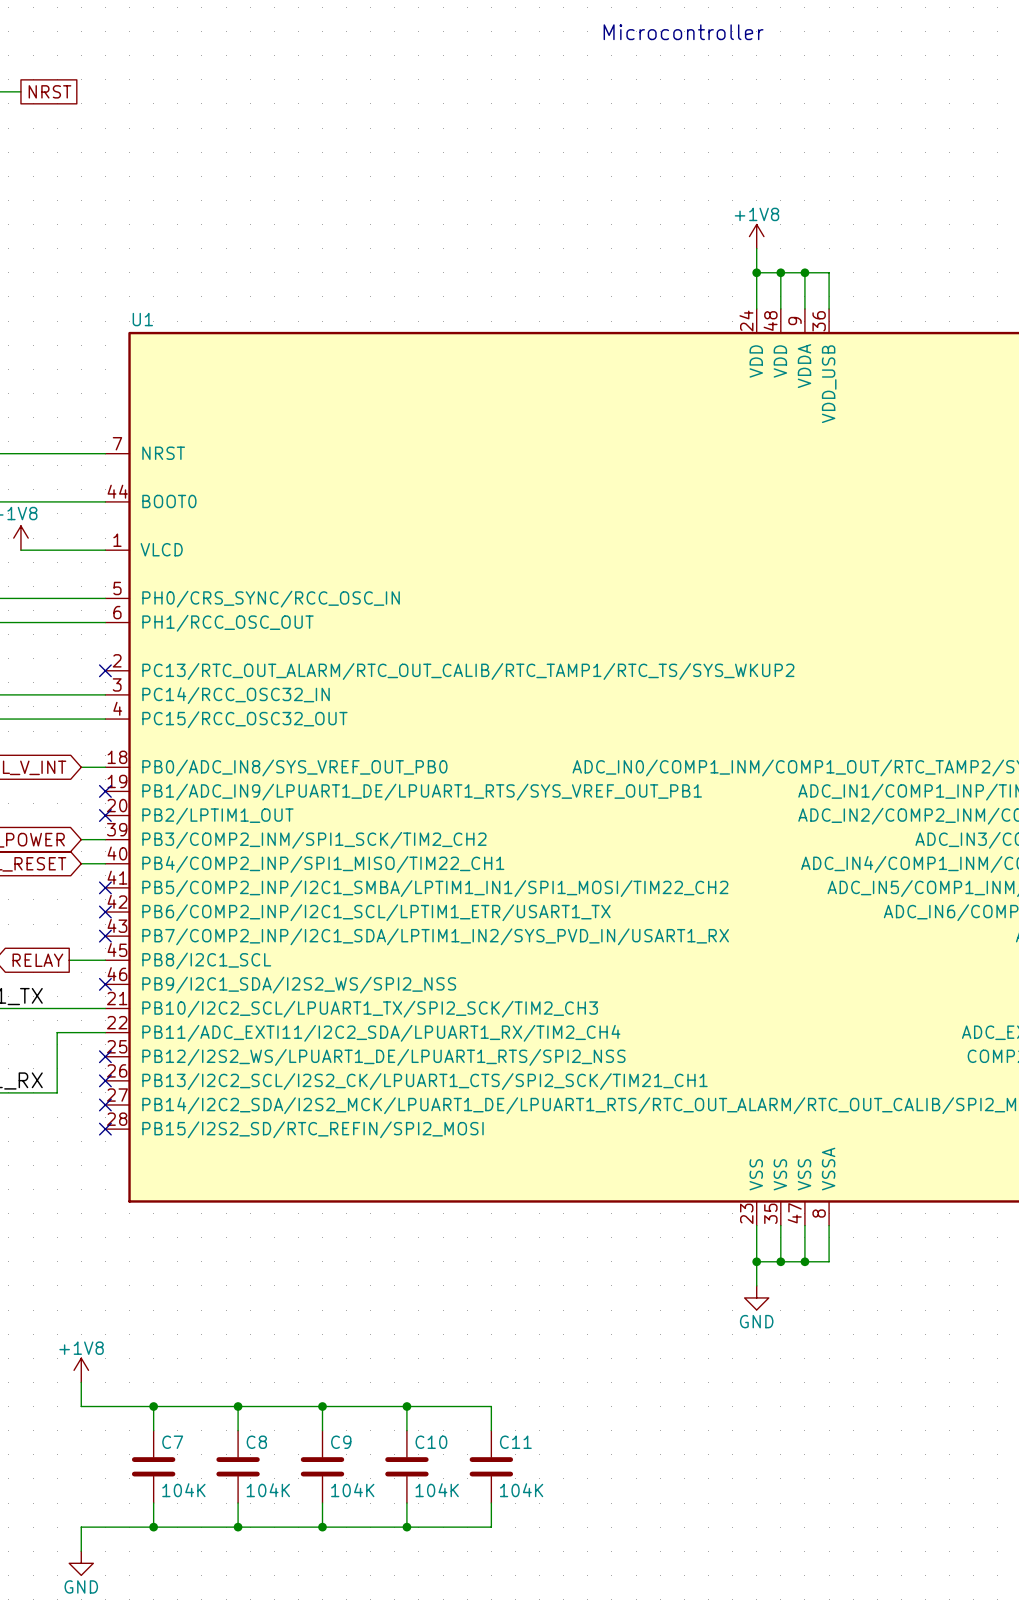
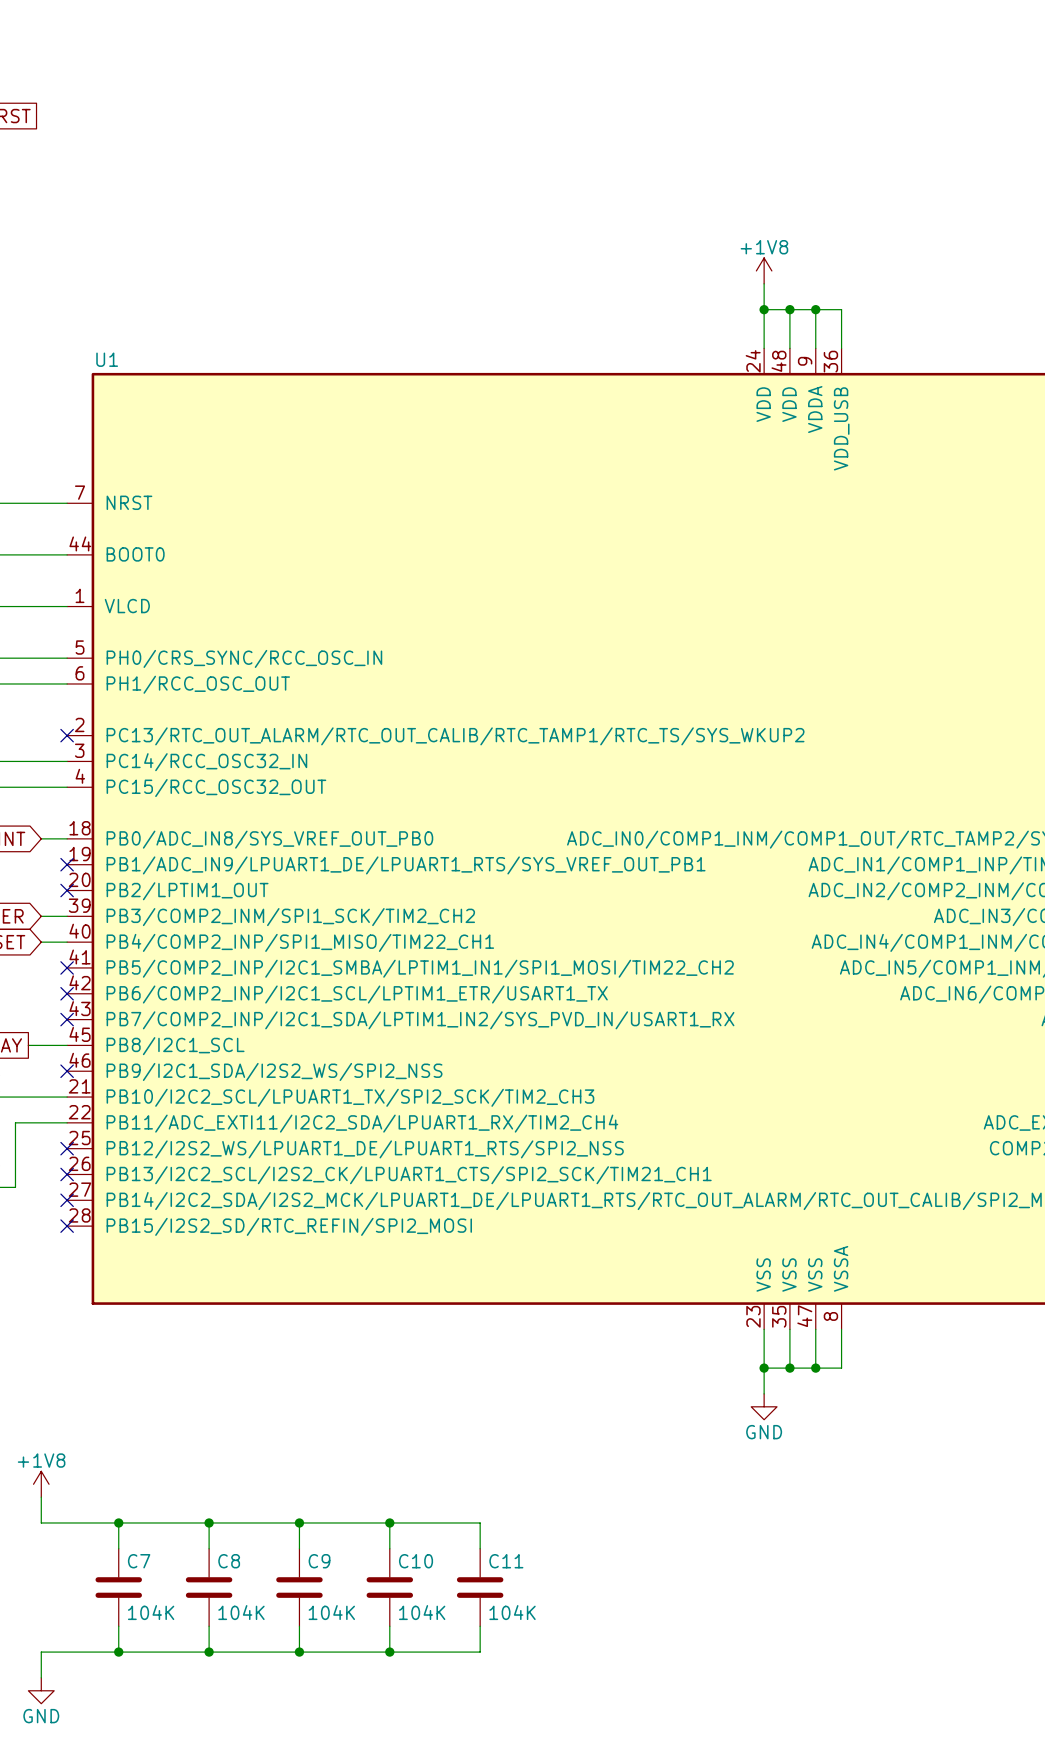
text: Microcontroller (683, 32) -> none

